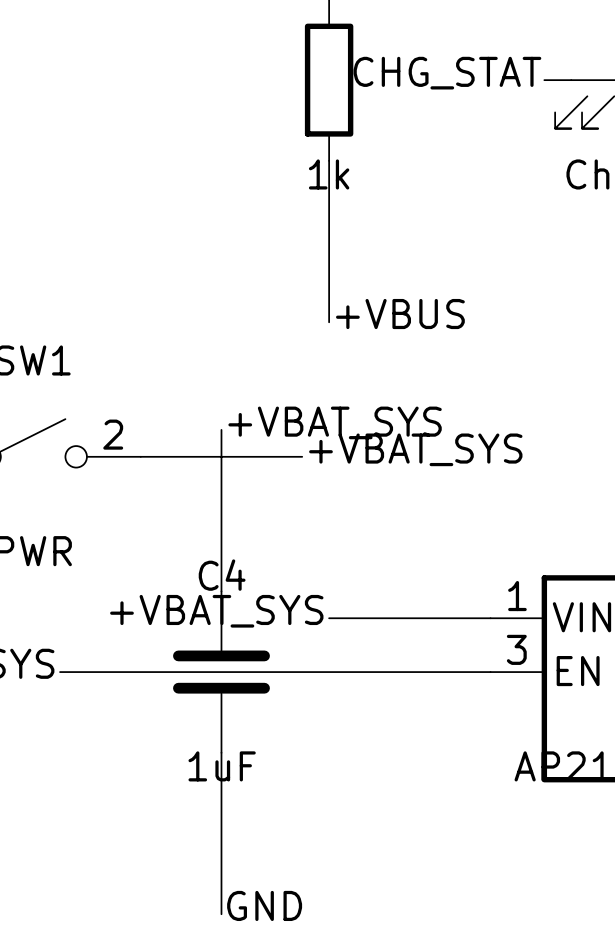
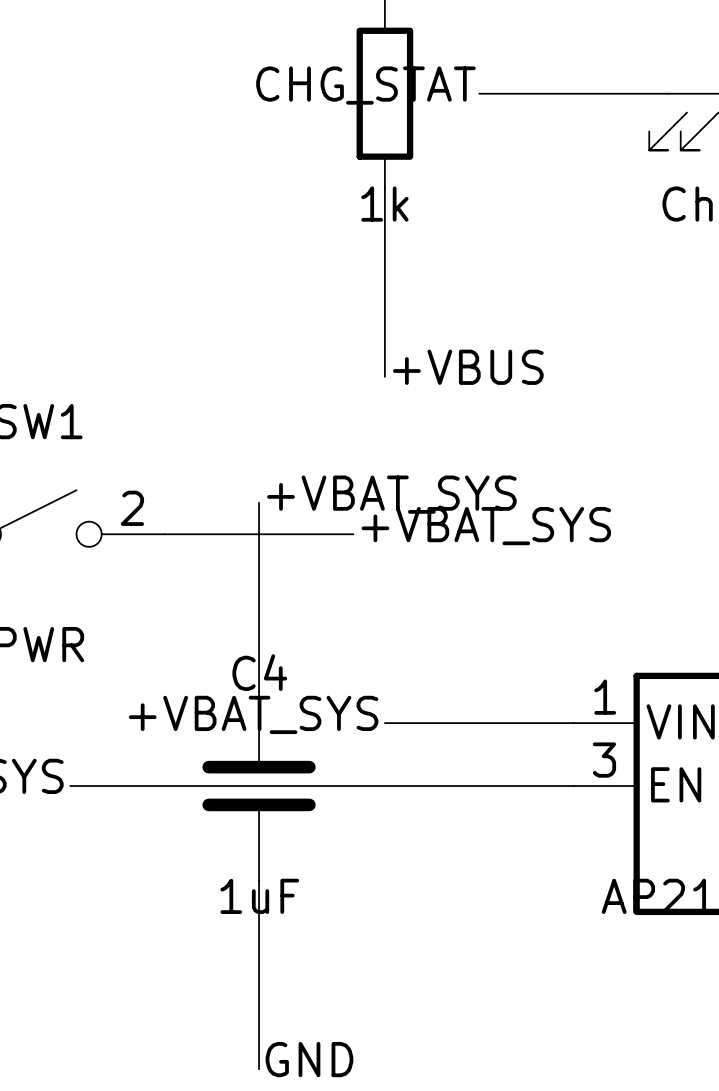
label position: CHG_STAT (447, 73) -> CHG_STAT (365, 85)
wire: none -> (479, 93) (636, 93)

